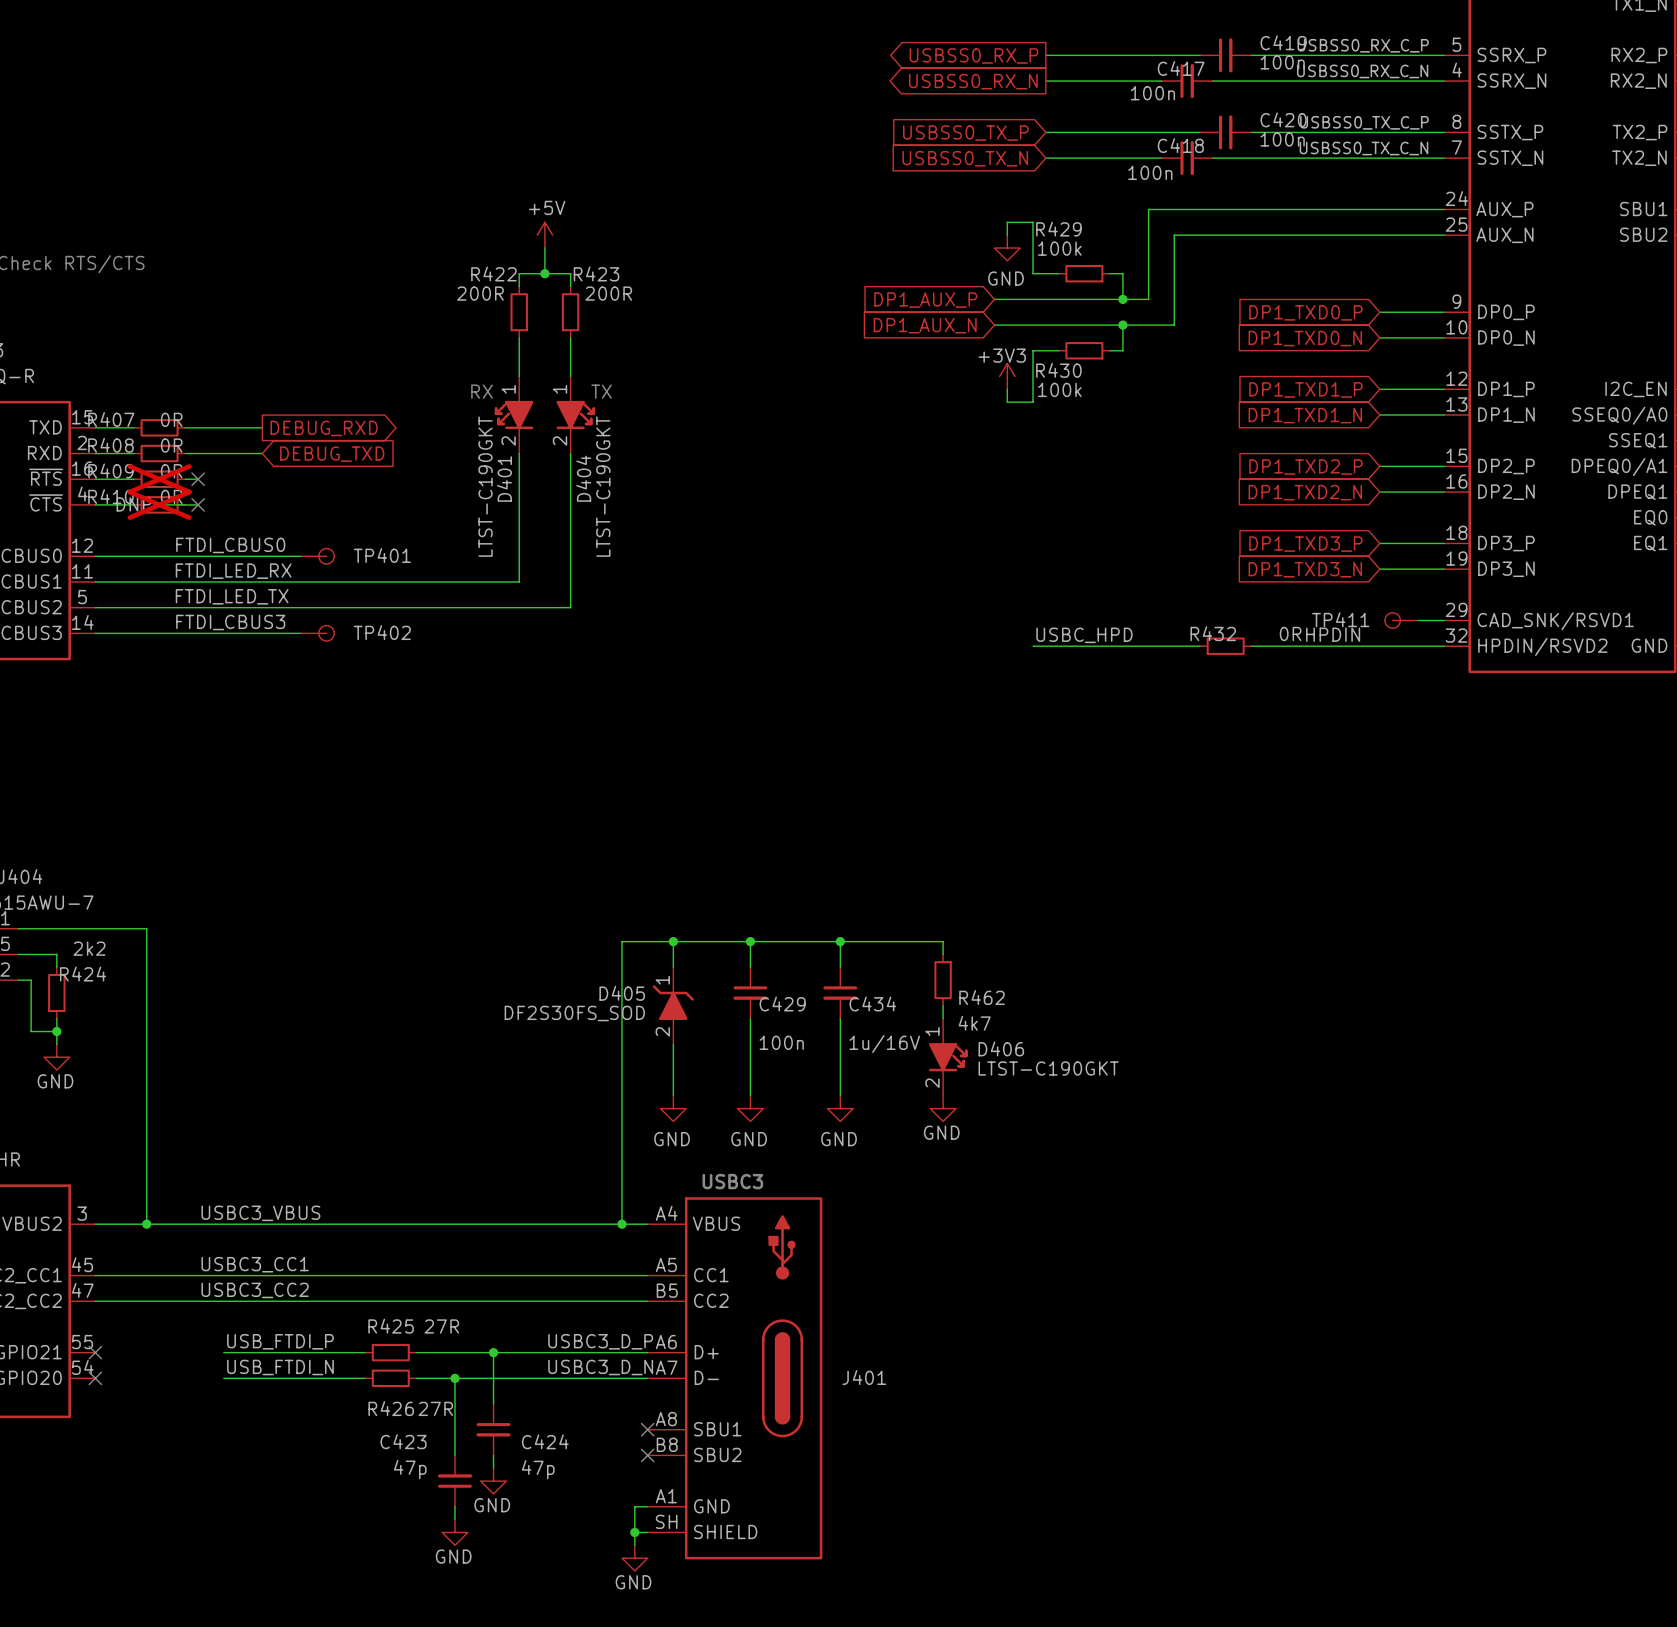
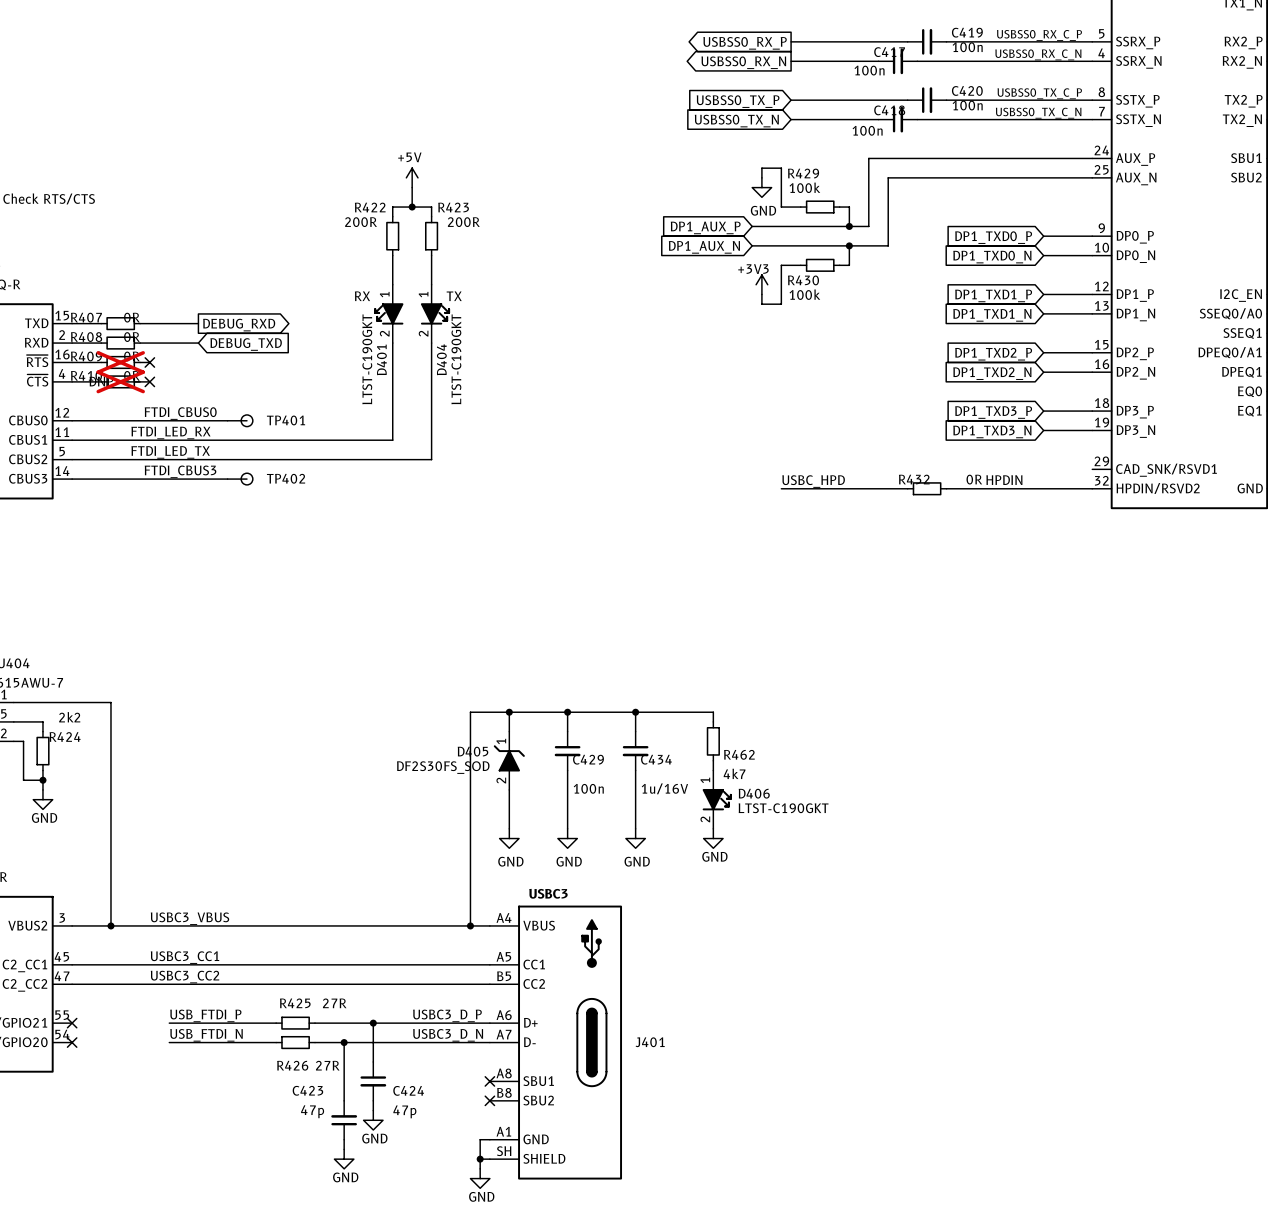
TP411: (1401, 620) -> none
wire: (1418, 620) (1444, 620) -> none

